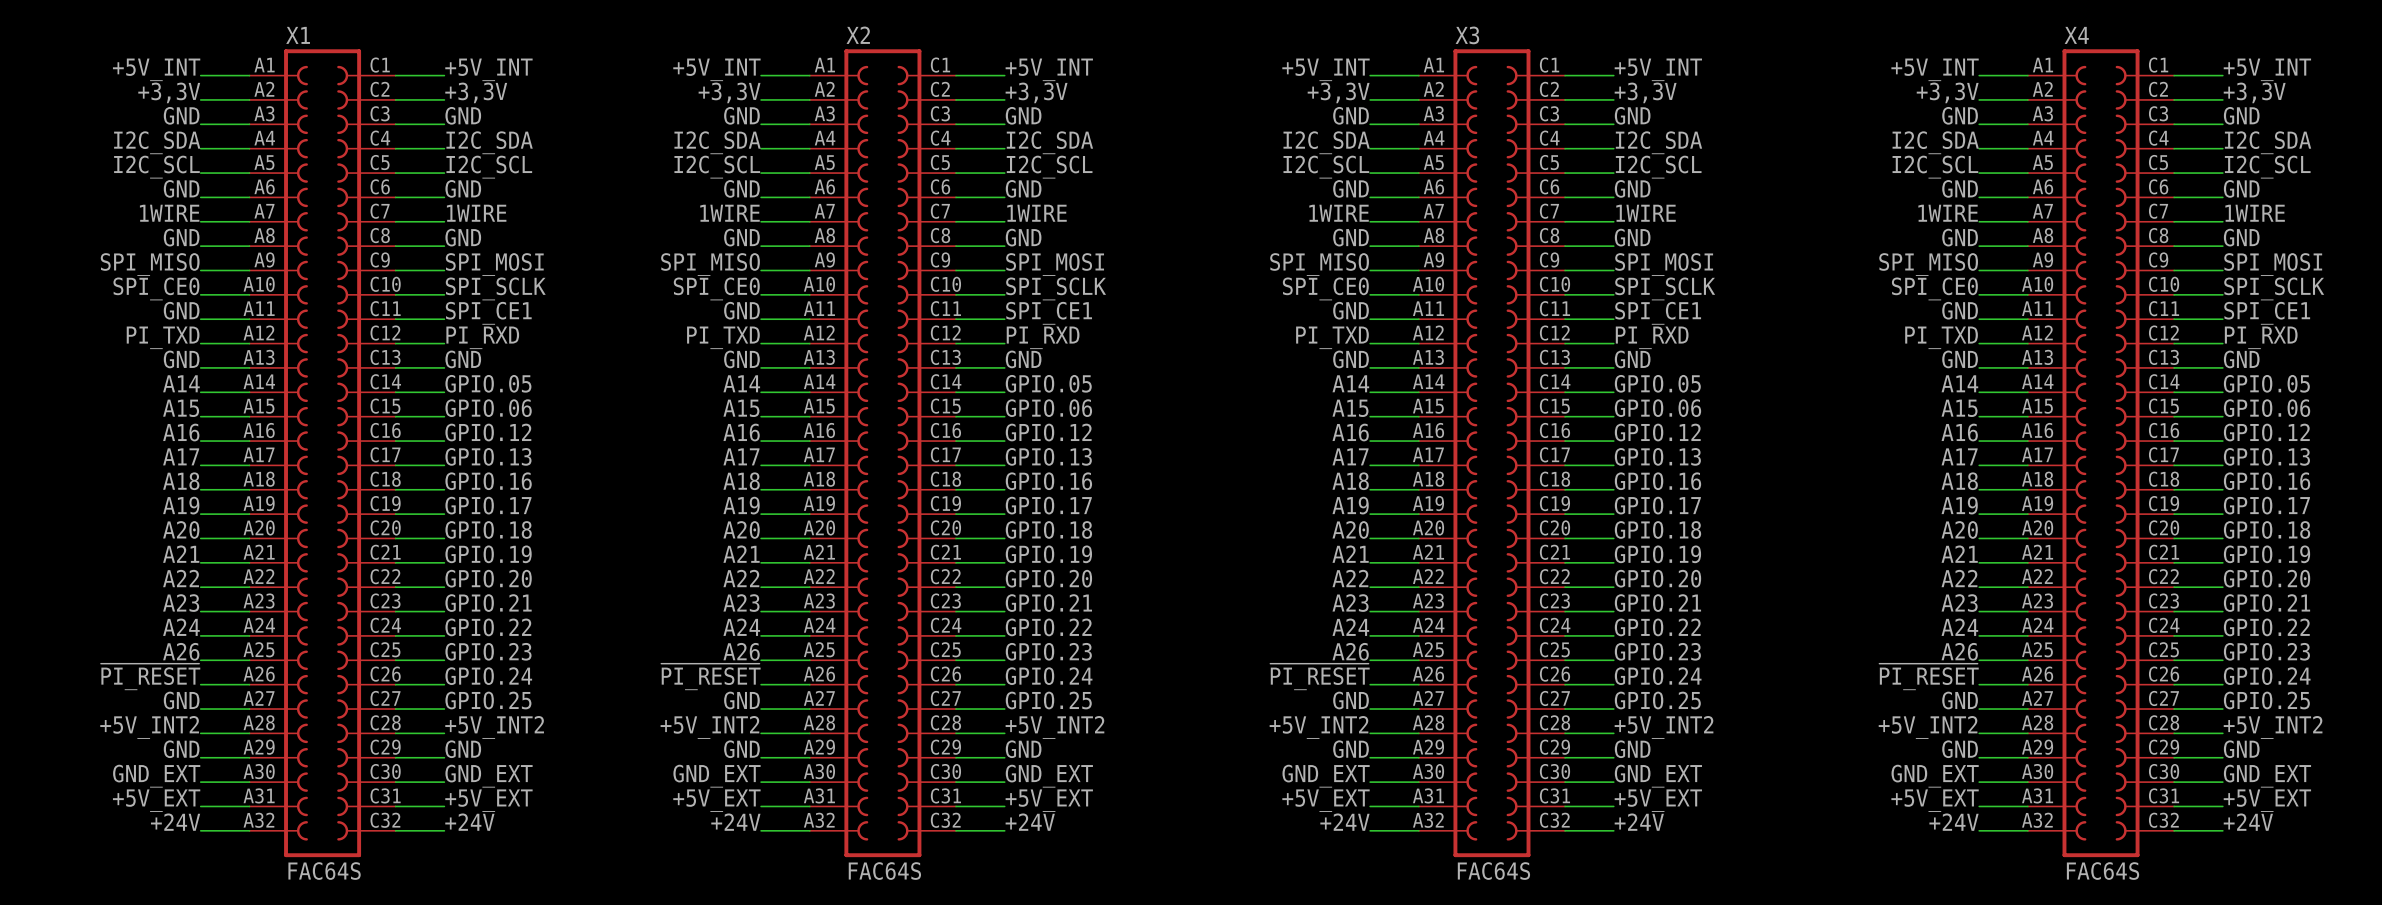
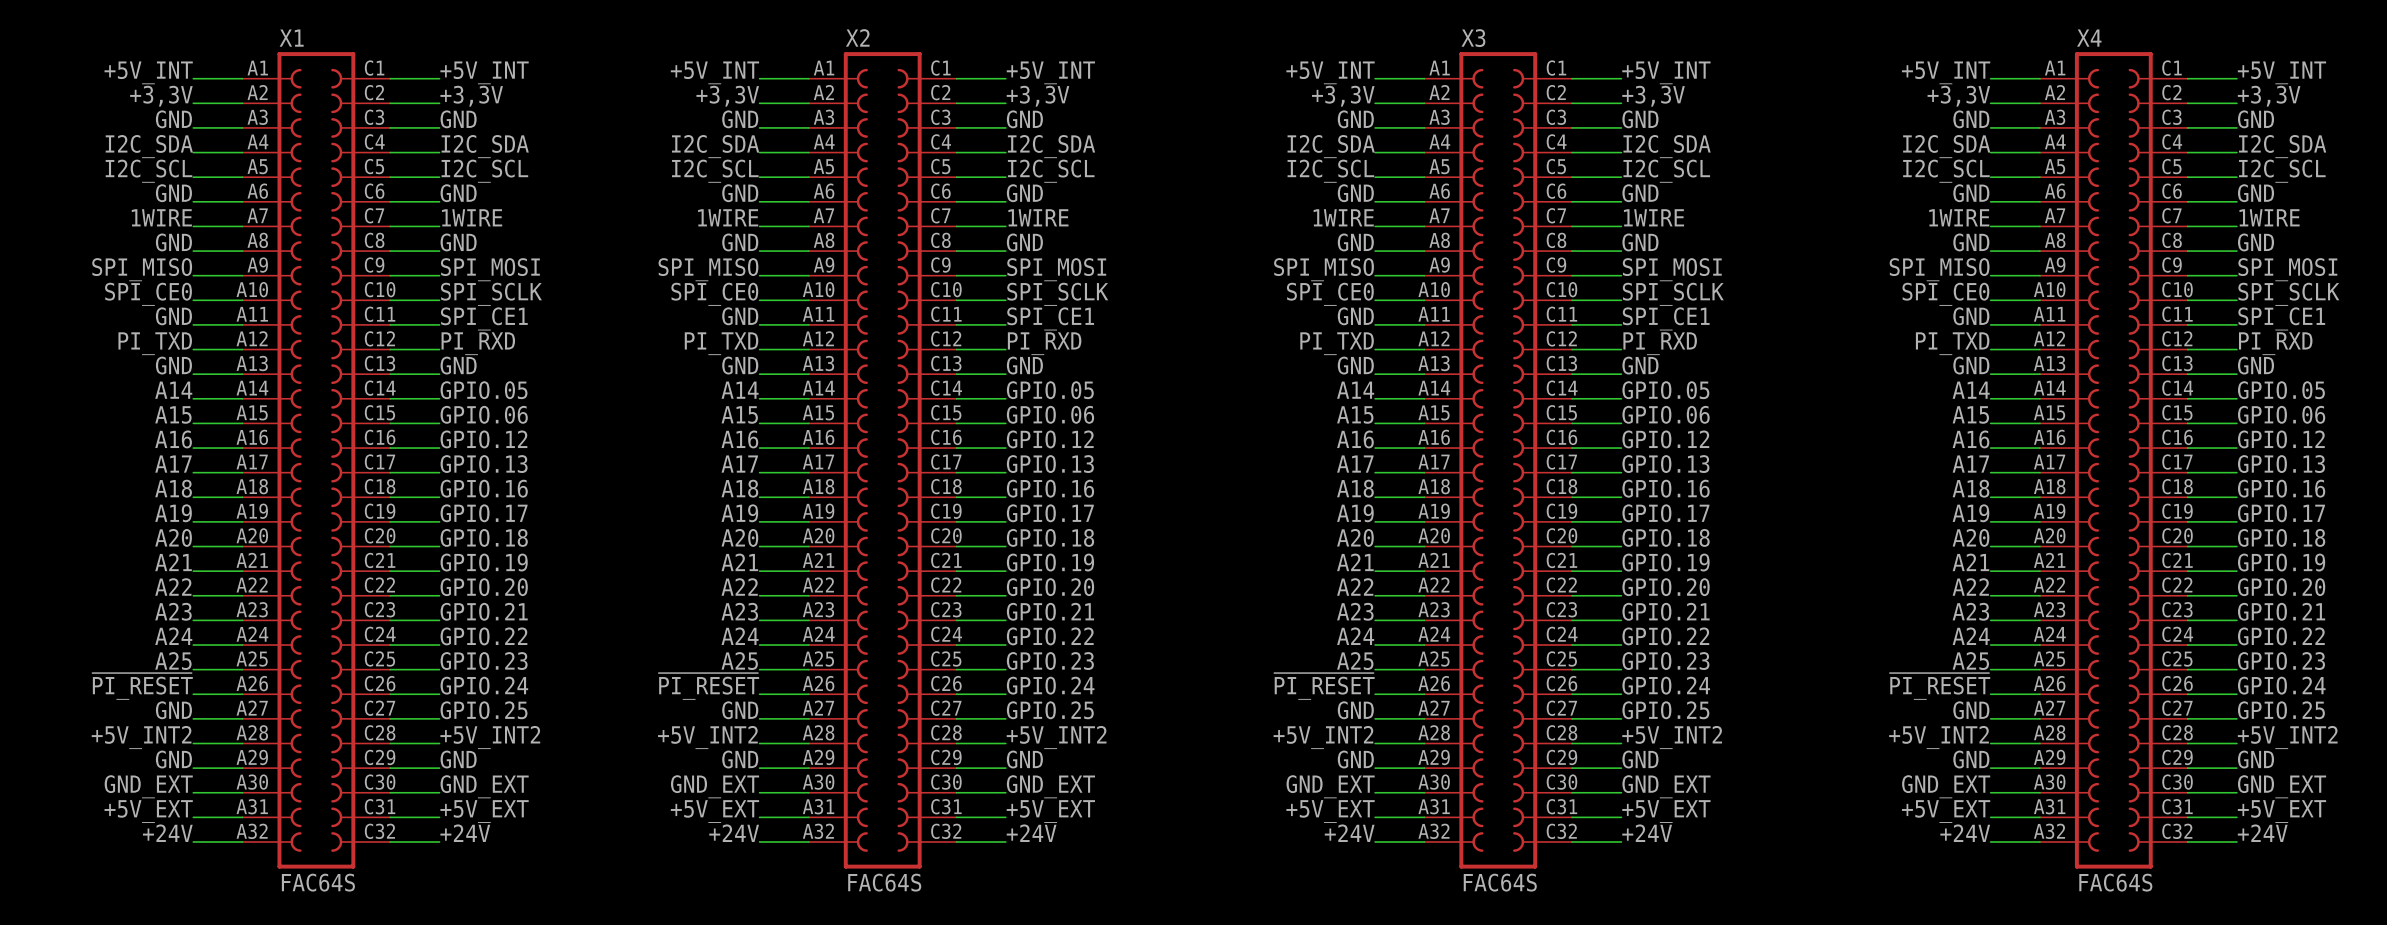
label: A26 (181, 651) -> A25 (173, 661)
label: A26 (741, 651) -> A25 (739, 661)
label: A26 (1350, 651) -> A25 (1355, 661)
label: A26 (1959, 651) -> A25 (1970, 661)

